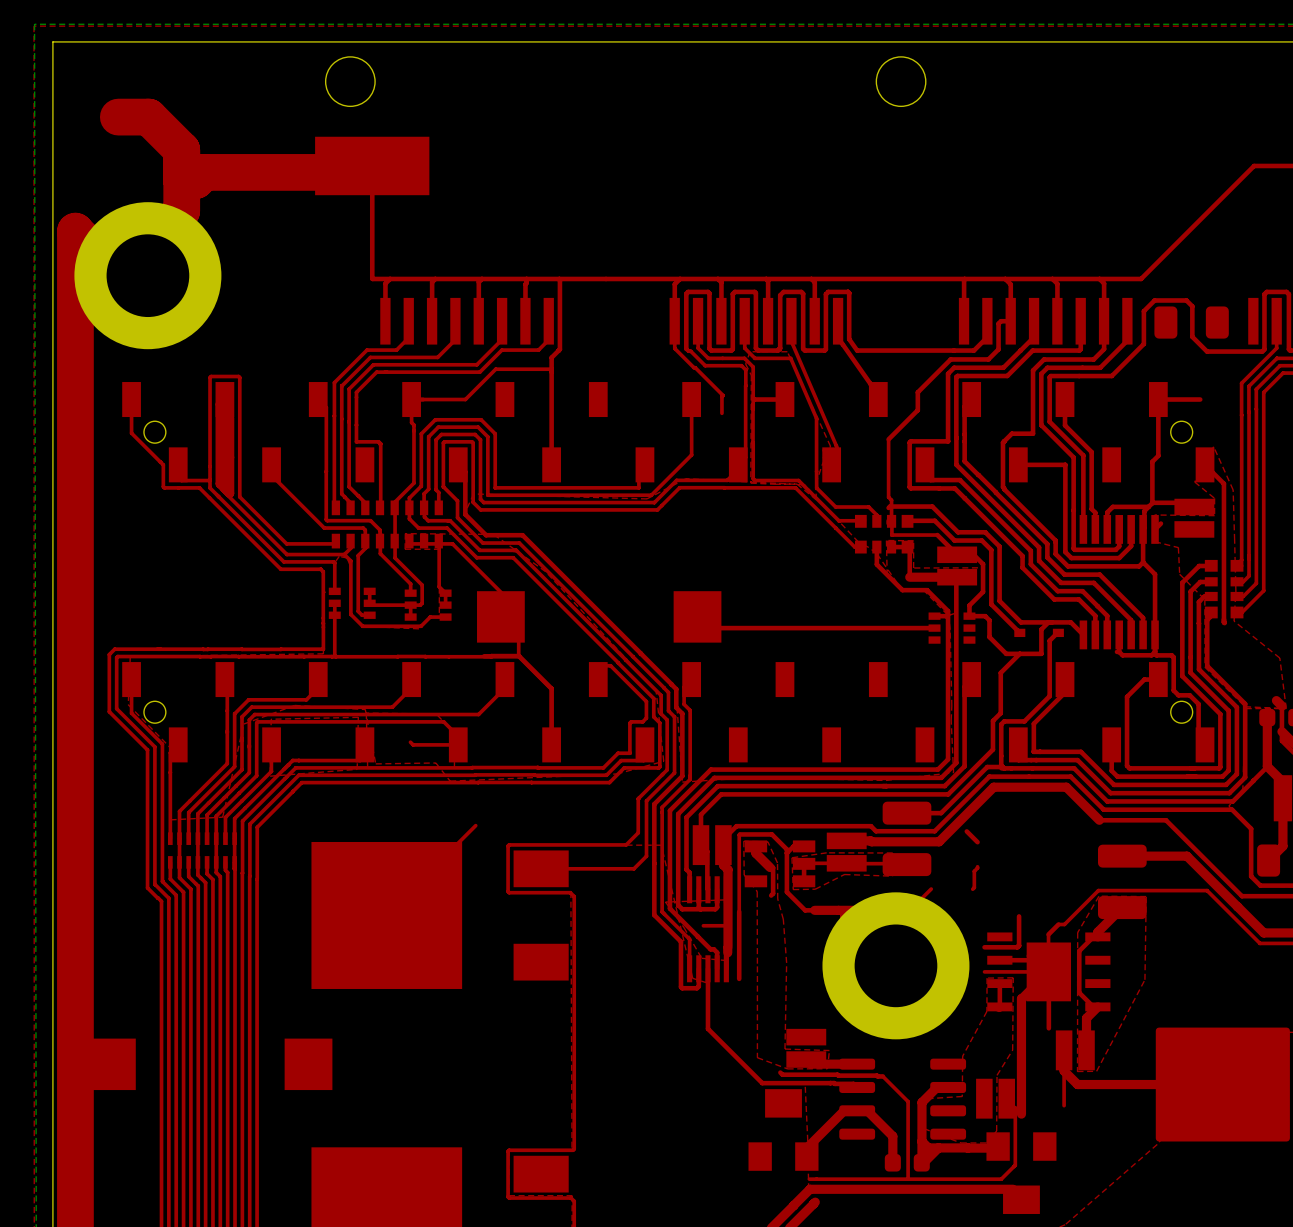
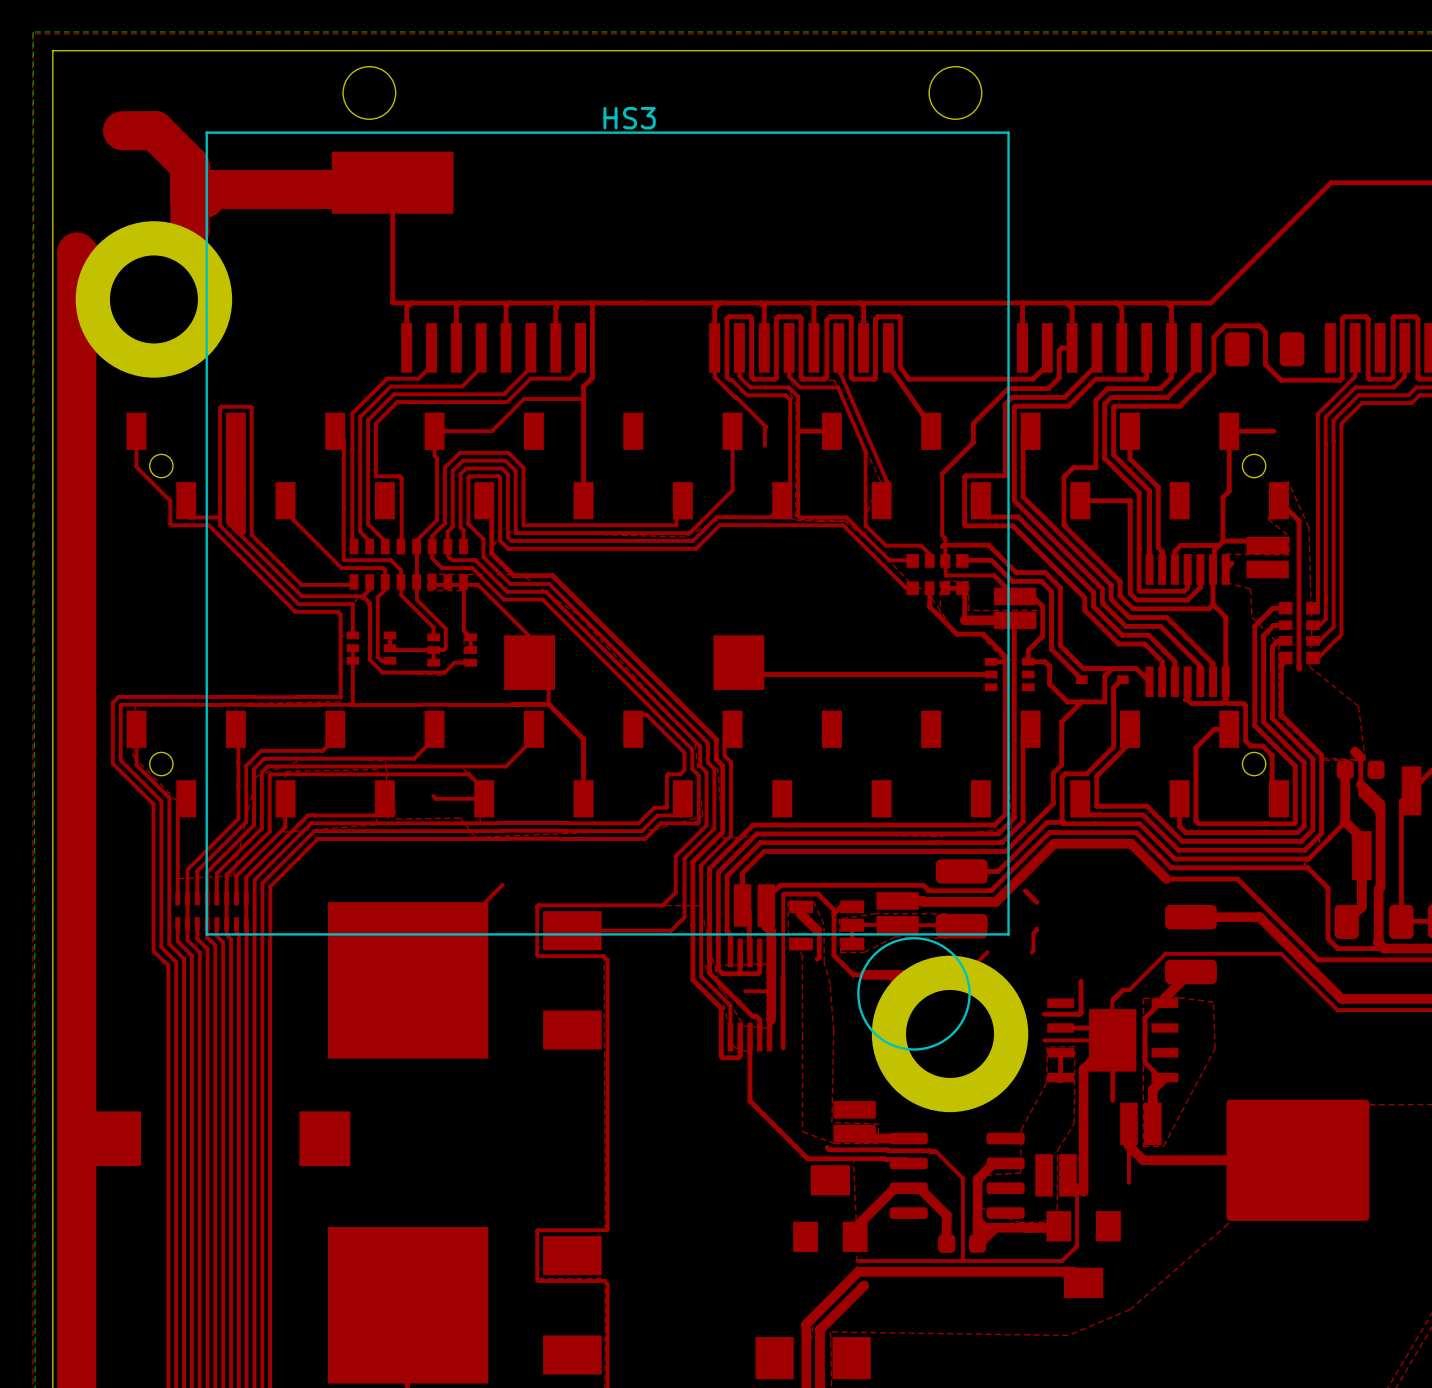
HS3: none -> (607, 533)
drawing: none -> [857, 937, 971, 1051]
top zone outline: (1077, 932) (1099, 896) (1146, 896) (1144, 979) -> (1143, 998) (1178, 997) (1213, 1002) (1215, 1048)

